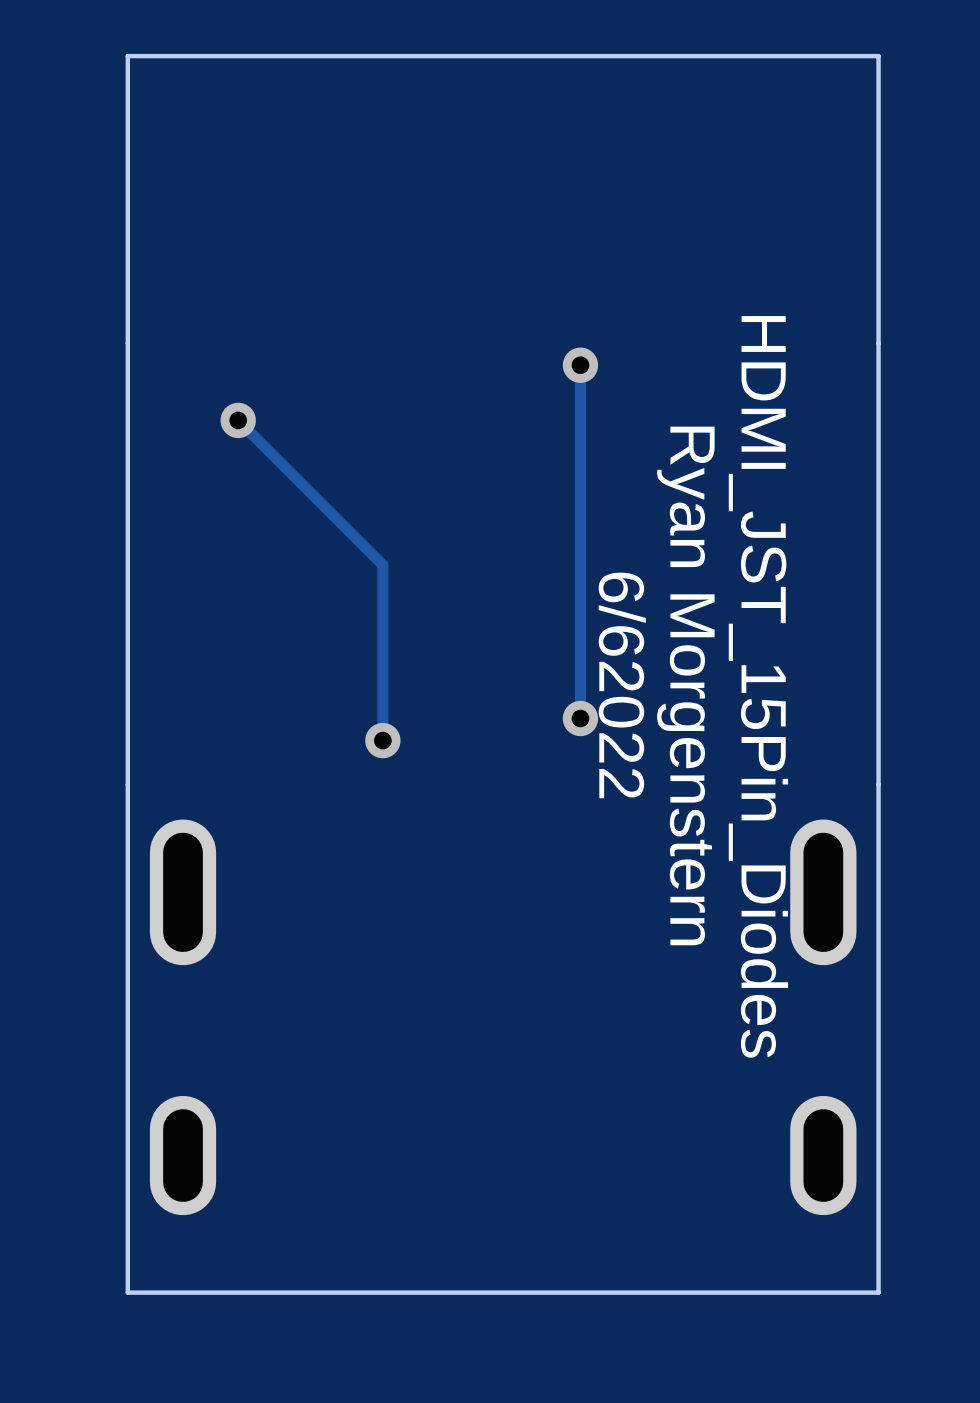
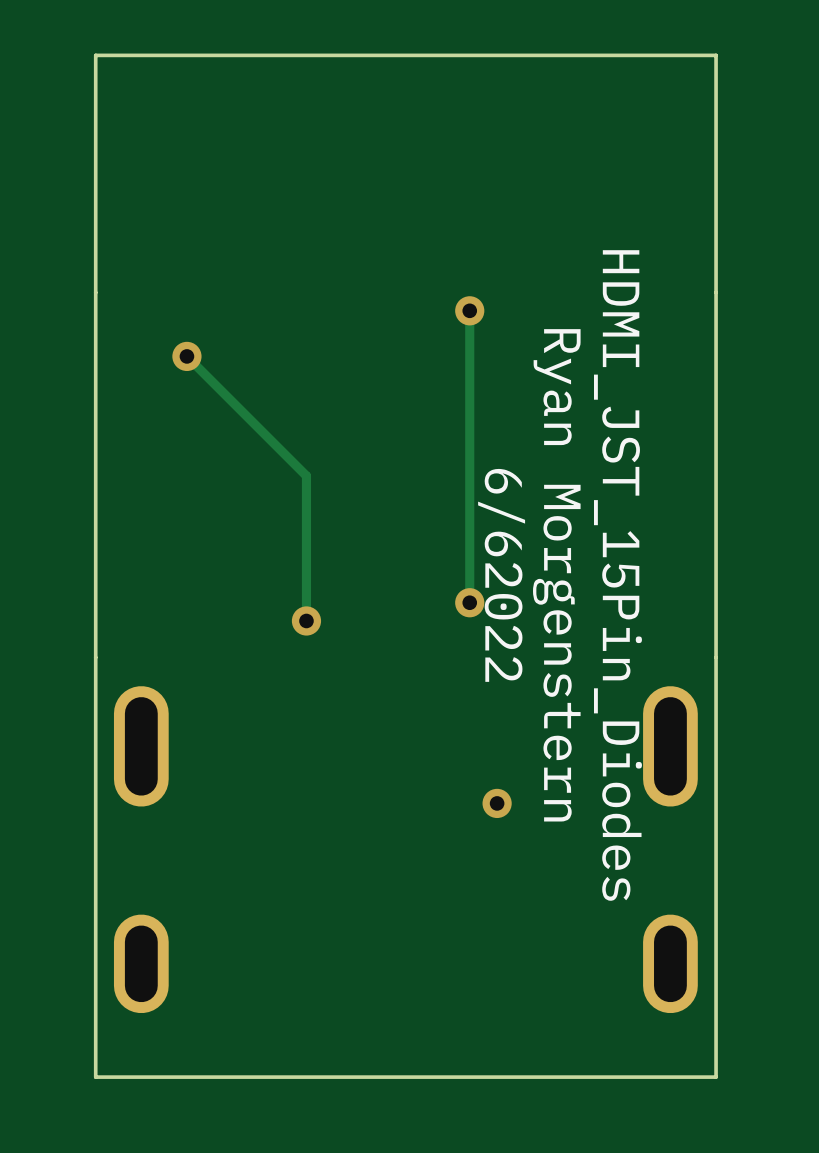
via: none -> (497, 803)

